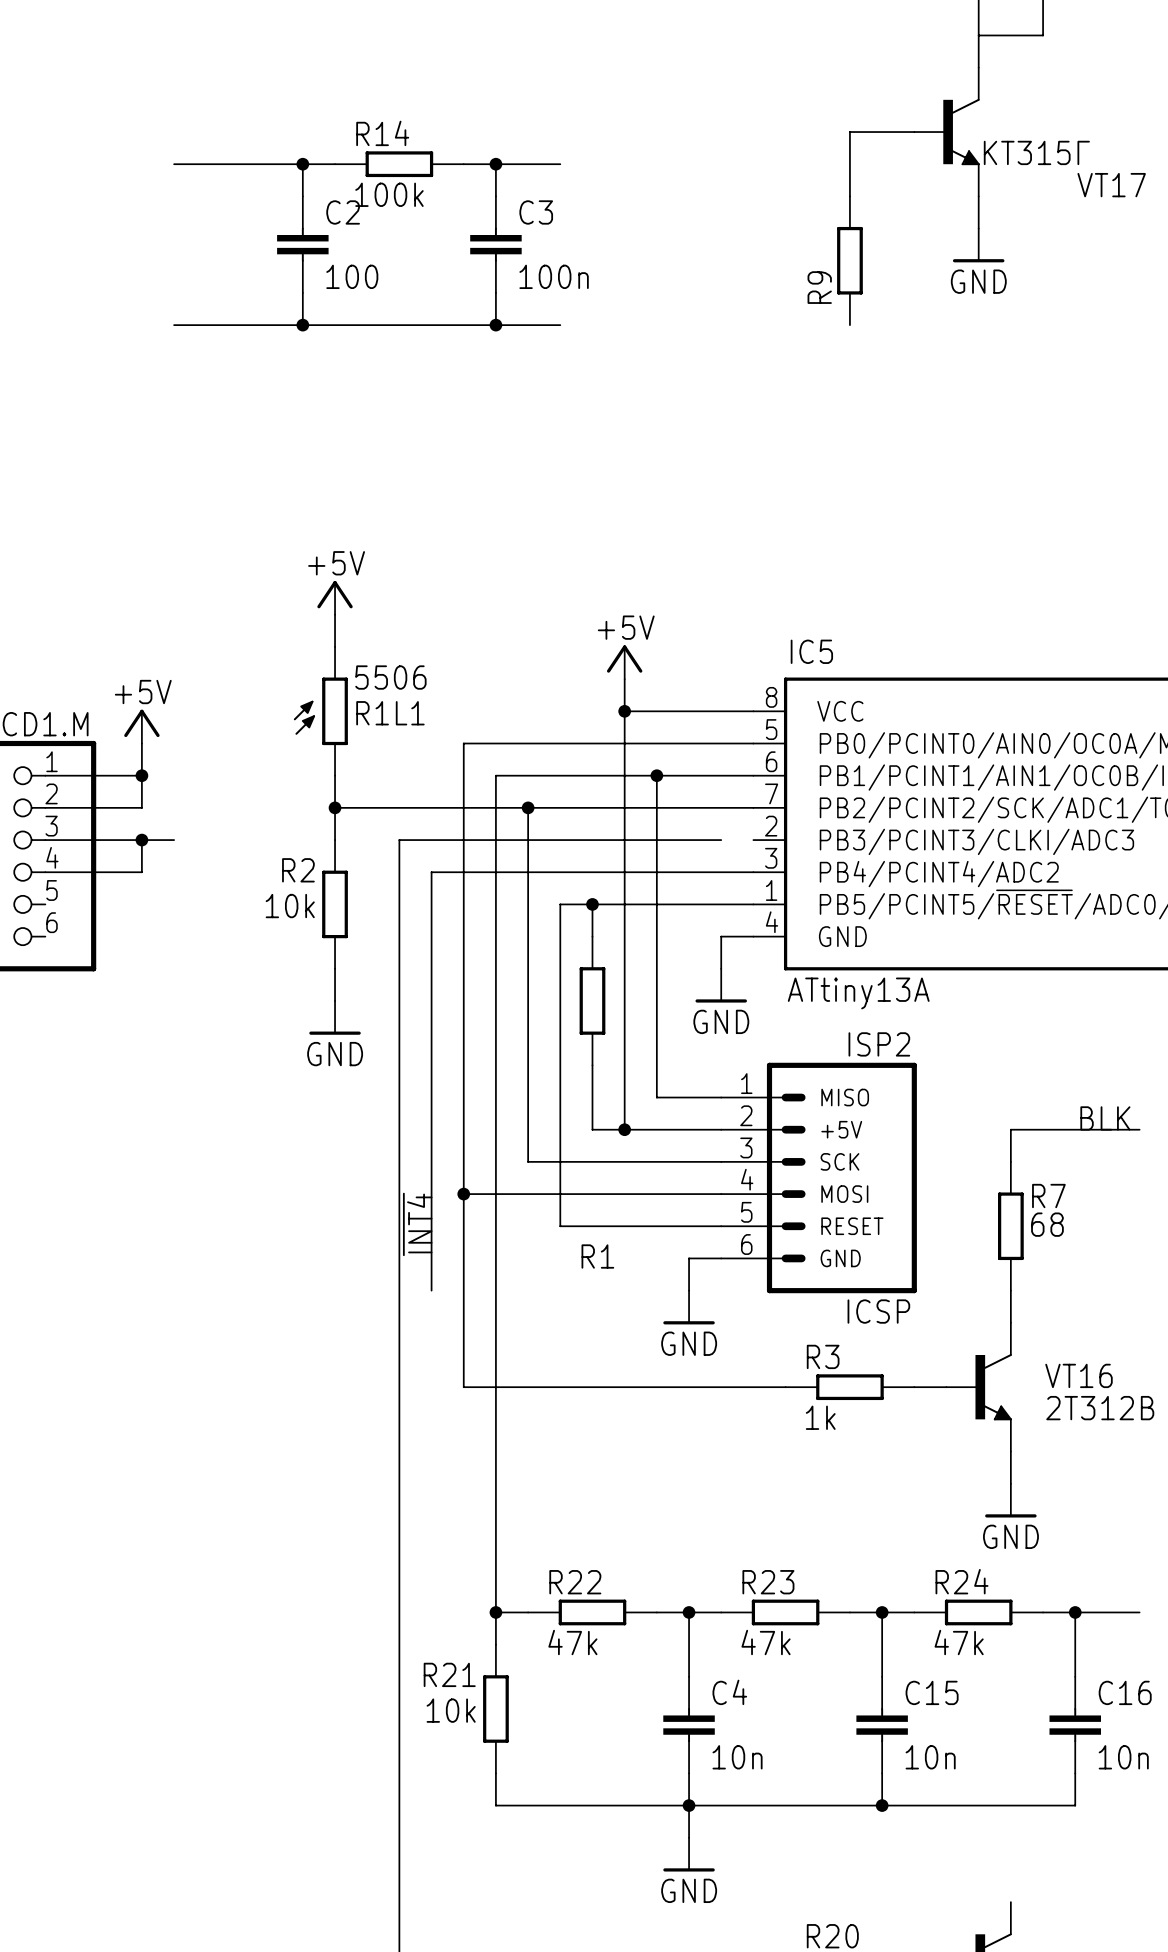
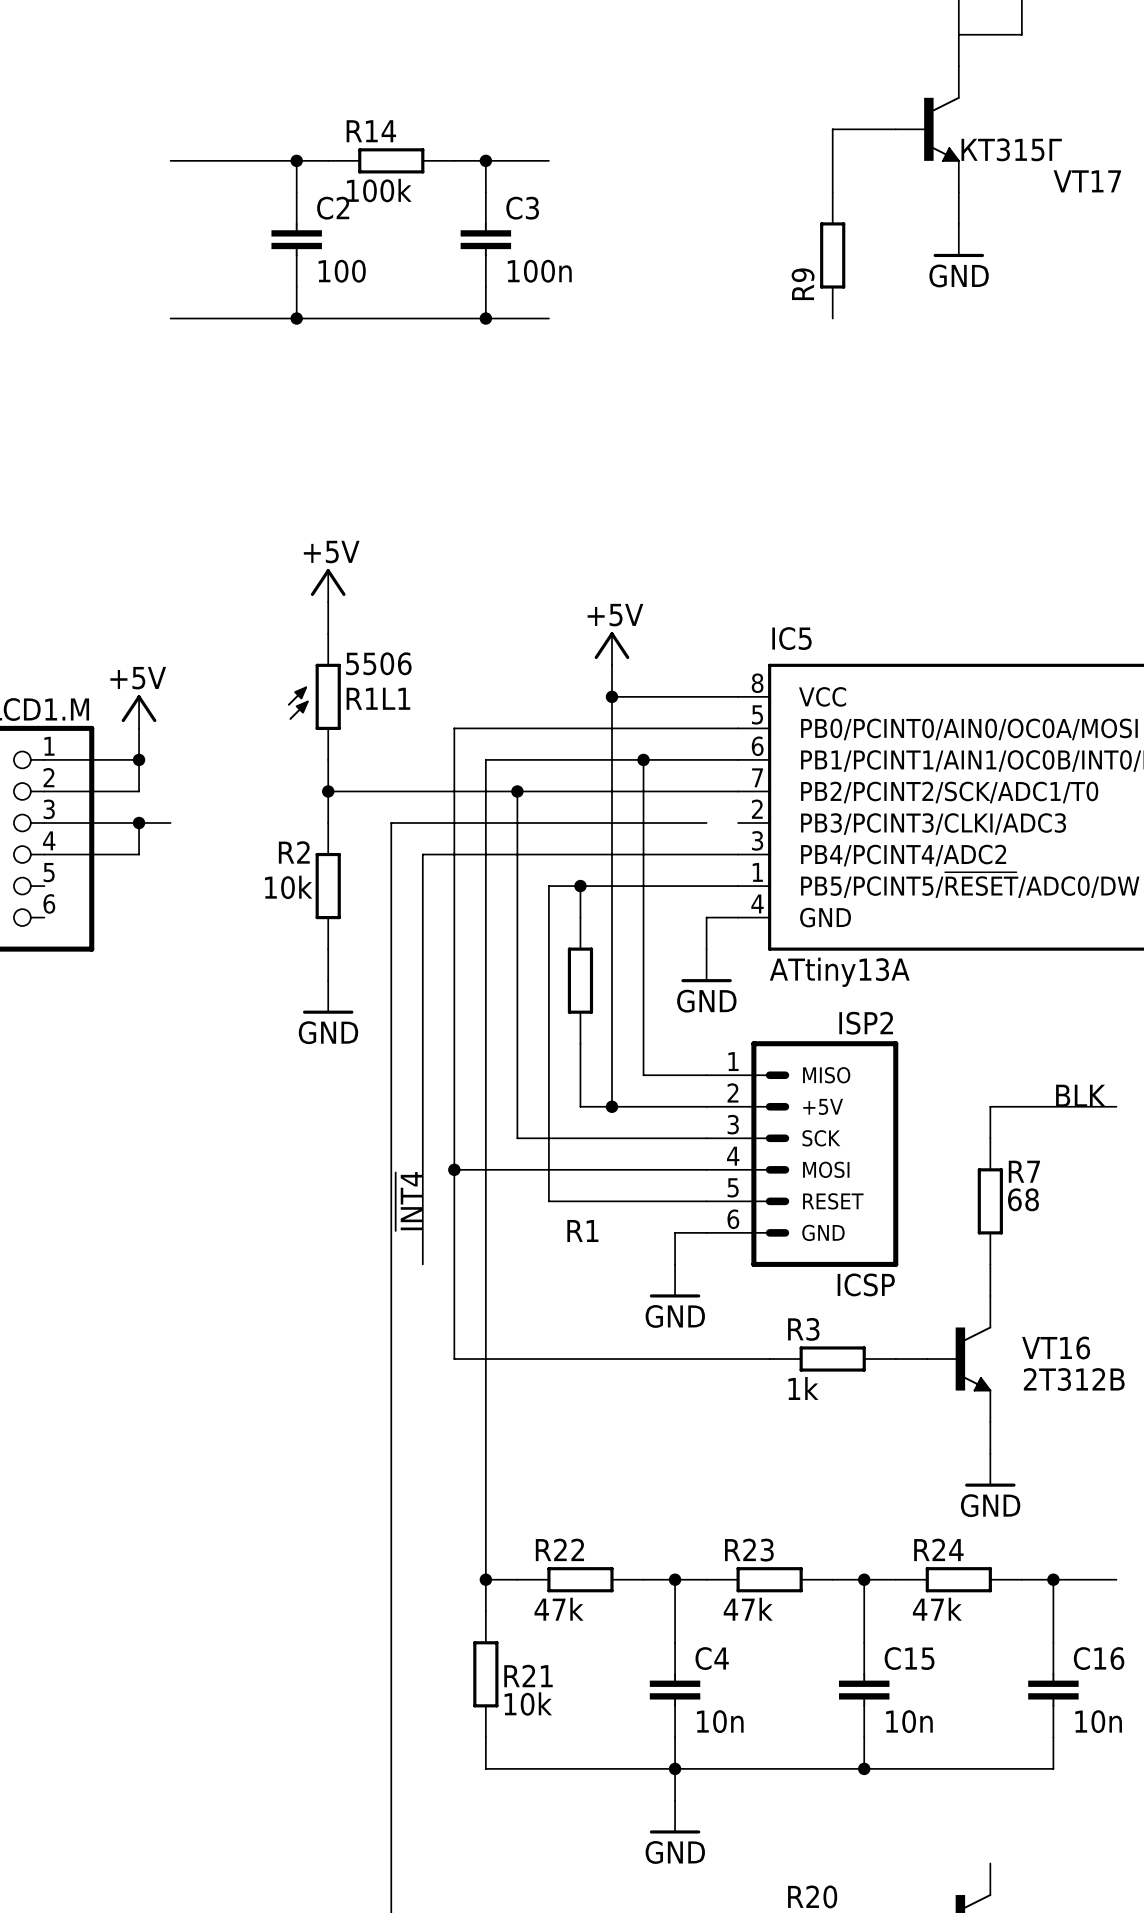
R21 name position: R21 (449, 1674) -> R21 (528, 1676)
R21 value position: 10k (451, 1710) -> 10k (528, 1704)

